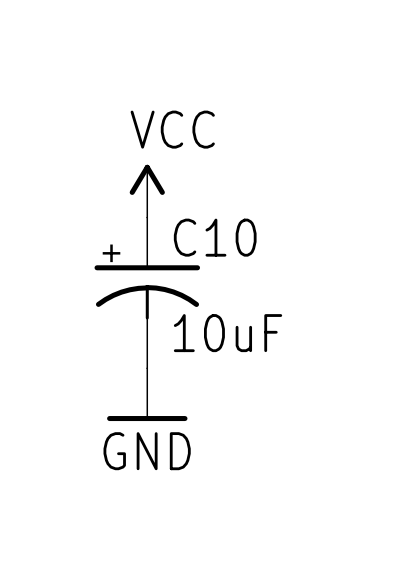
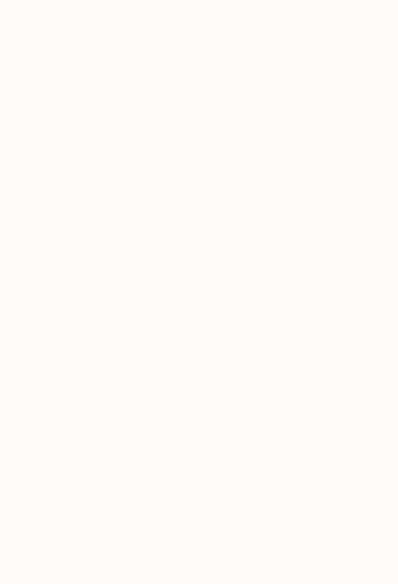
power symbol: VCC (147, 191) -> none
C10: 10uF (147, 292) -> none
power symbol: GND (147, 394) -> none

